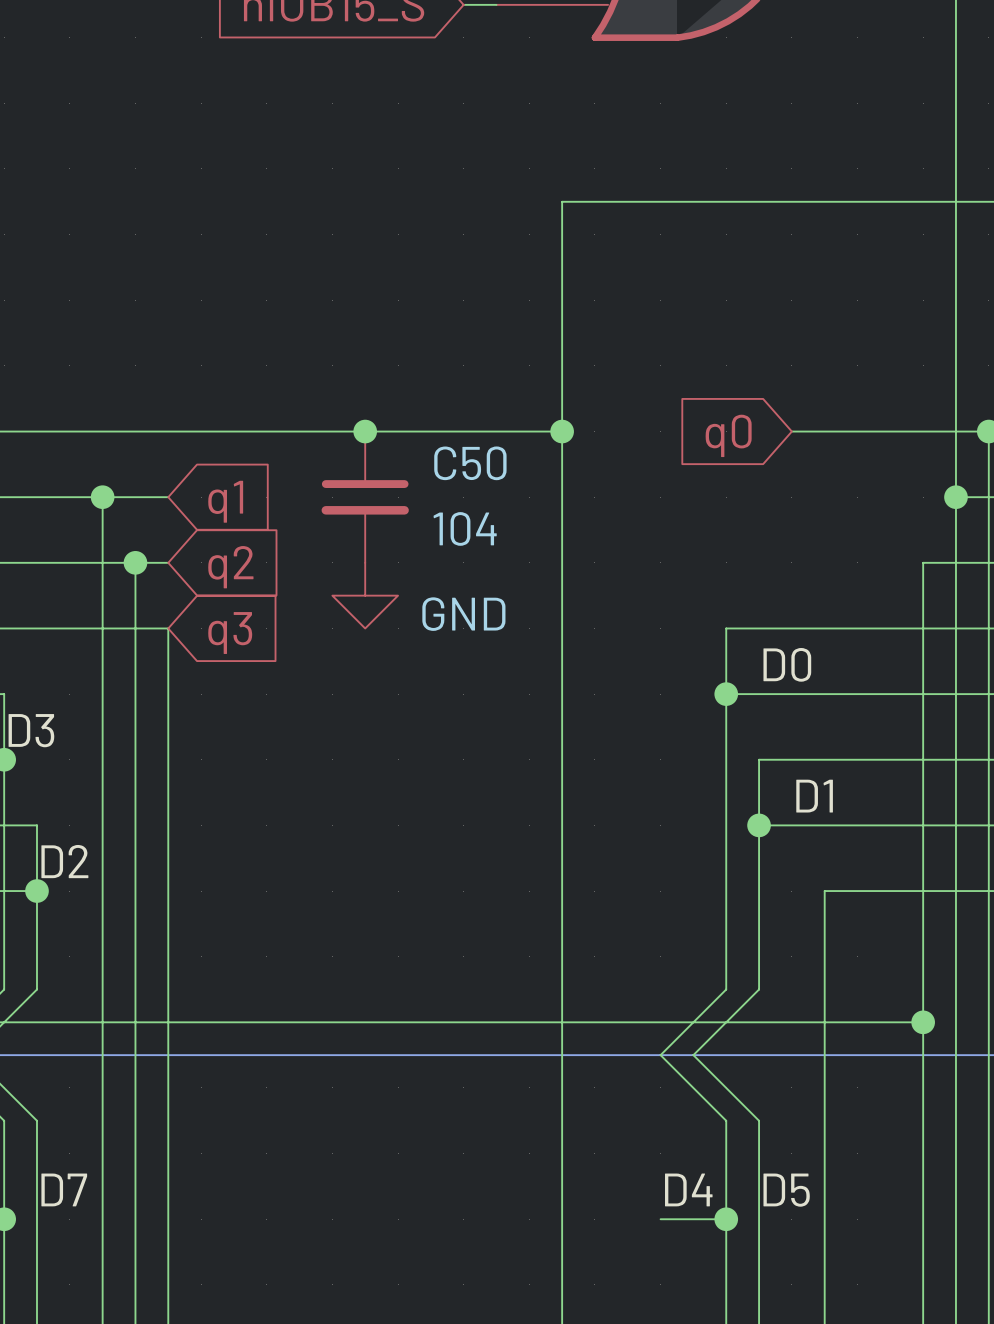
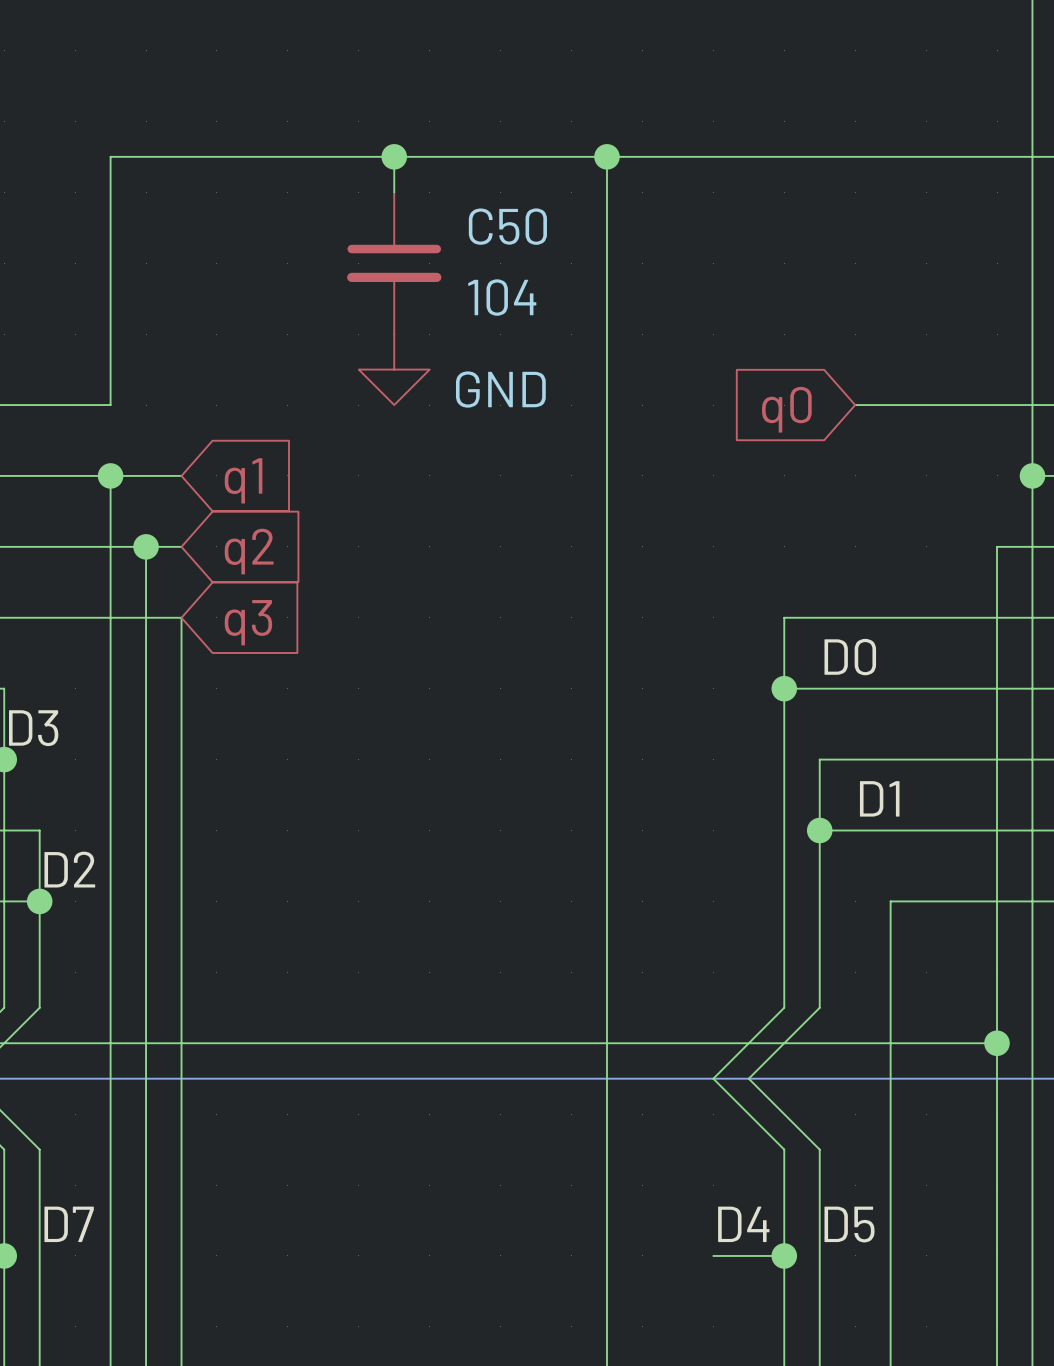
wire: none -> (394, 156) (394, 192)
junction: none -> (394, 156)
junction: none -> (606, 156)
wire: (102, 431) (562, 431) -> (110, 405) (110, 156) (606, 156)
junction: (365, 431) -> none
junction: (562, 431) -> none
C50 position: (365, 497) -> (394, 263)
power symbol position: GND (365, 595) -> GND (394, 369)

